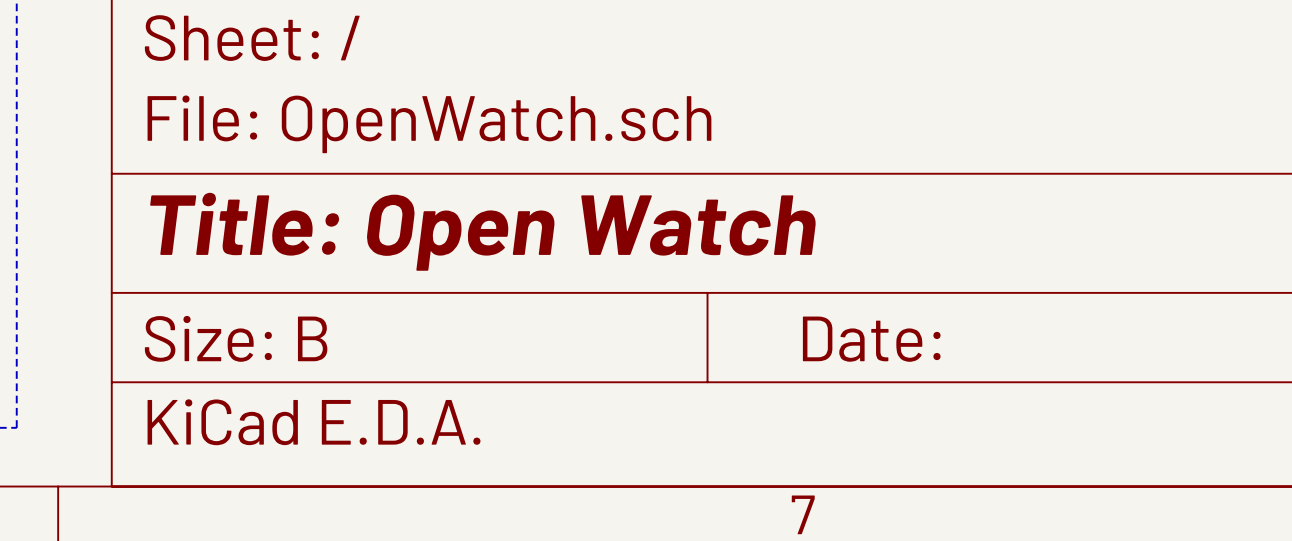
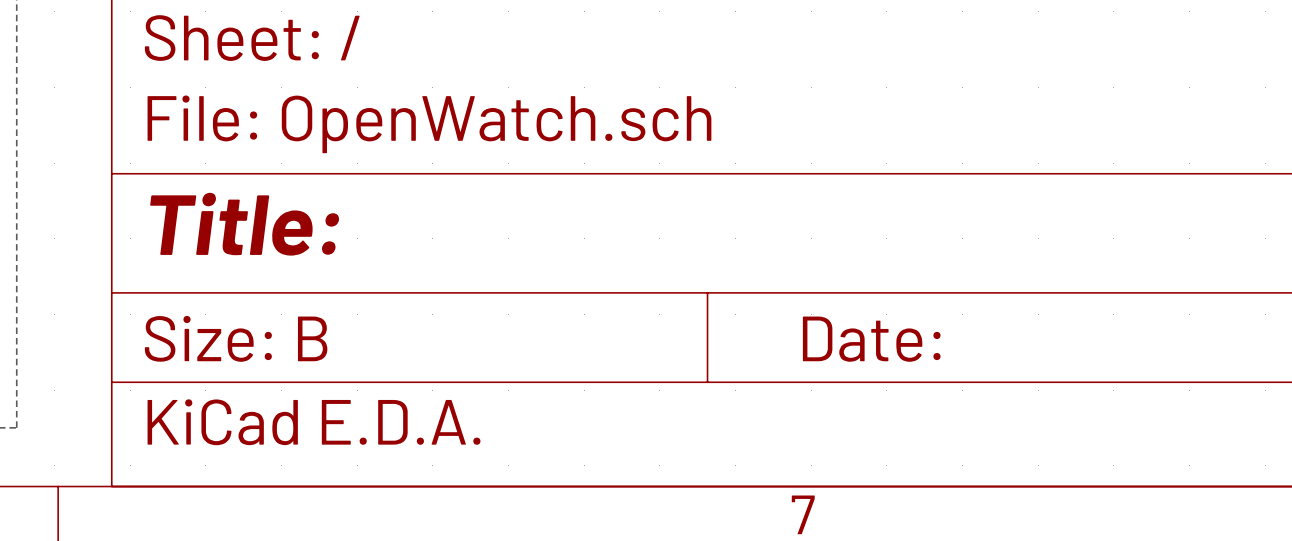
title block: Title: Open Watch (483, 231) -> Title: (244, 224)

